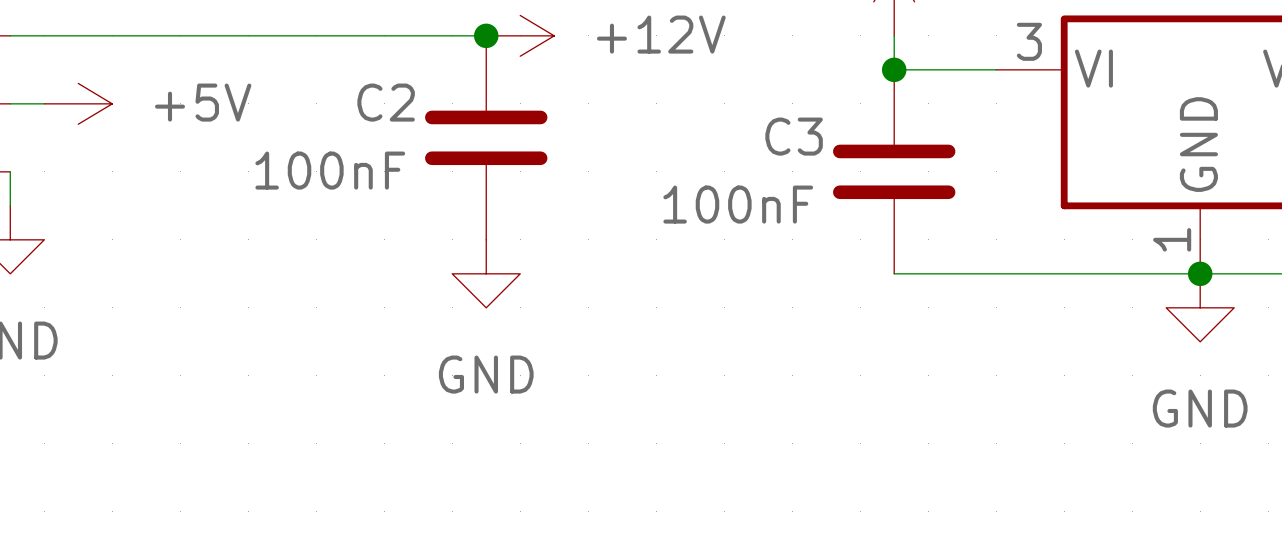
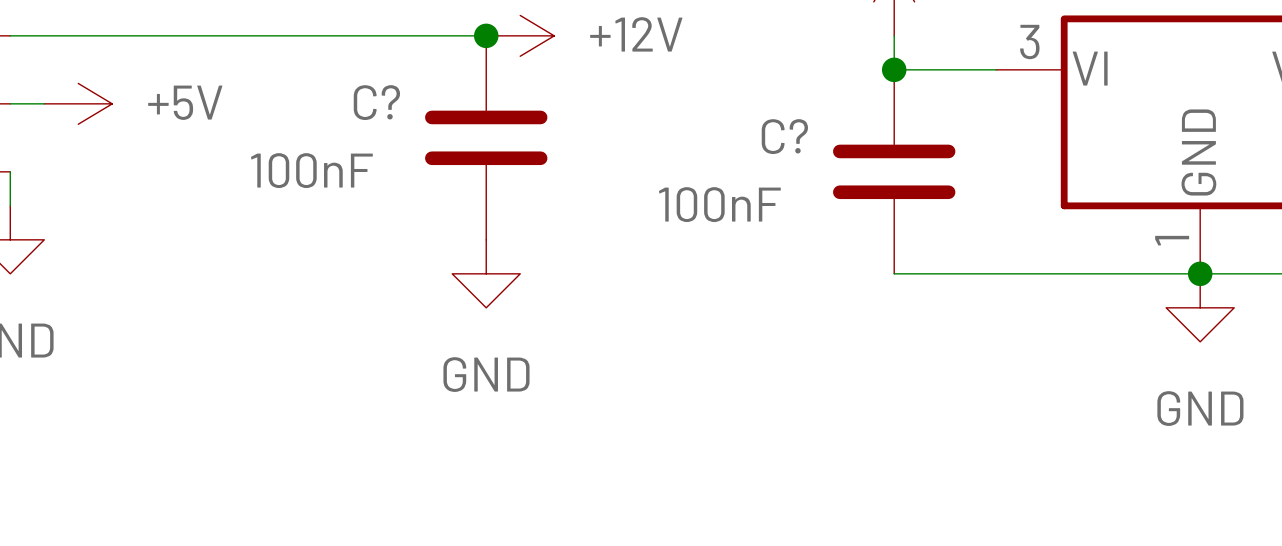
C2 name: C2 (386, 102) -> C? (376, 102)
C3 name: C3 (794, 136) -> C? (784, 136)

